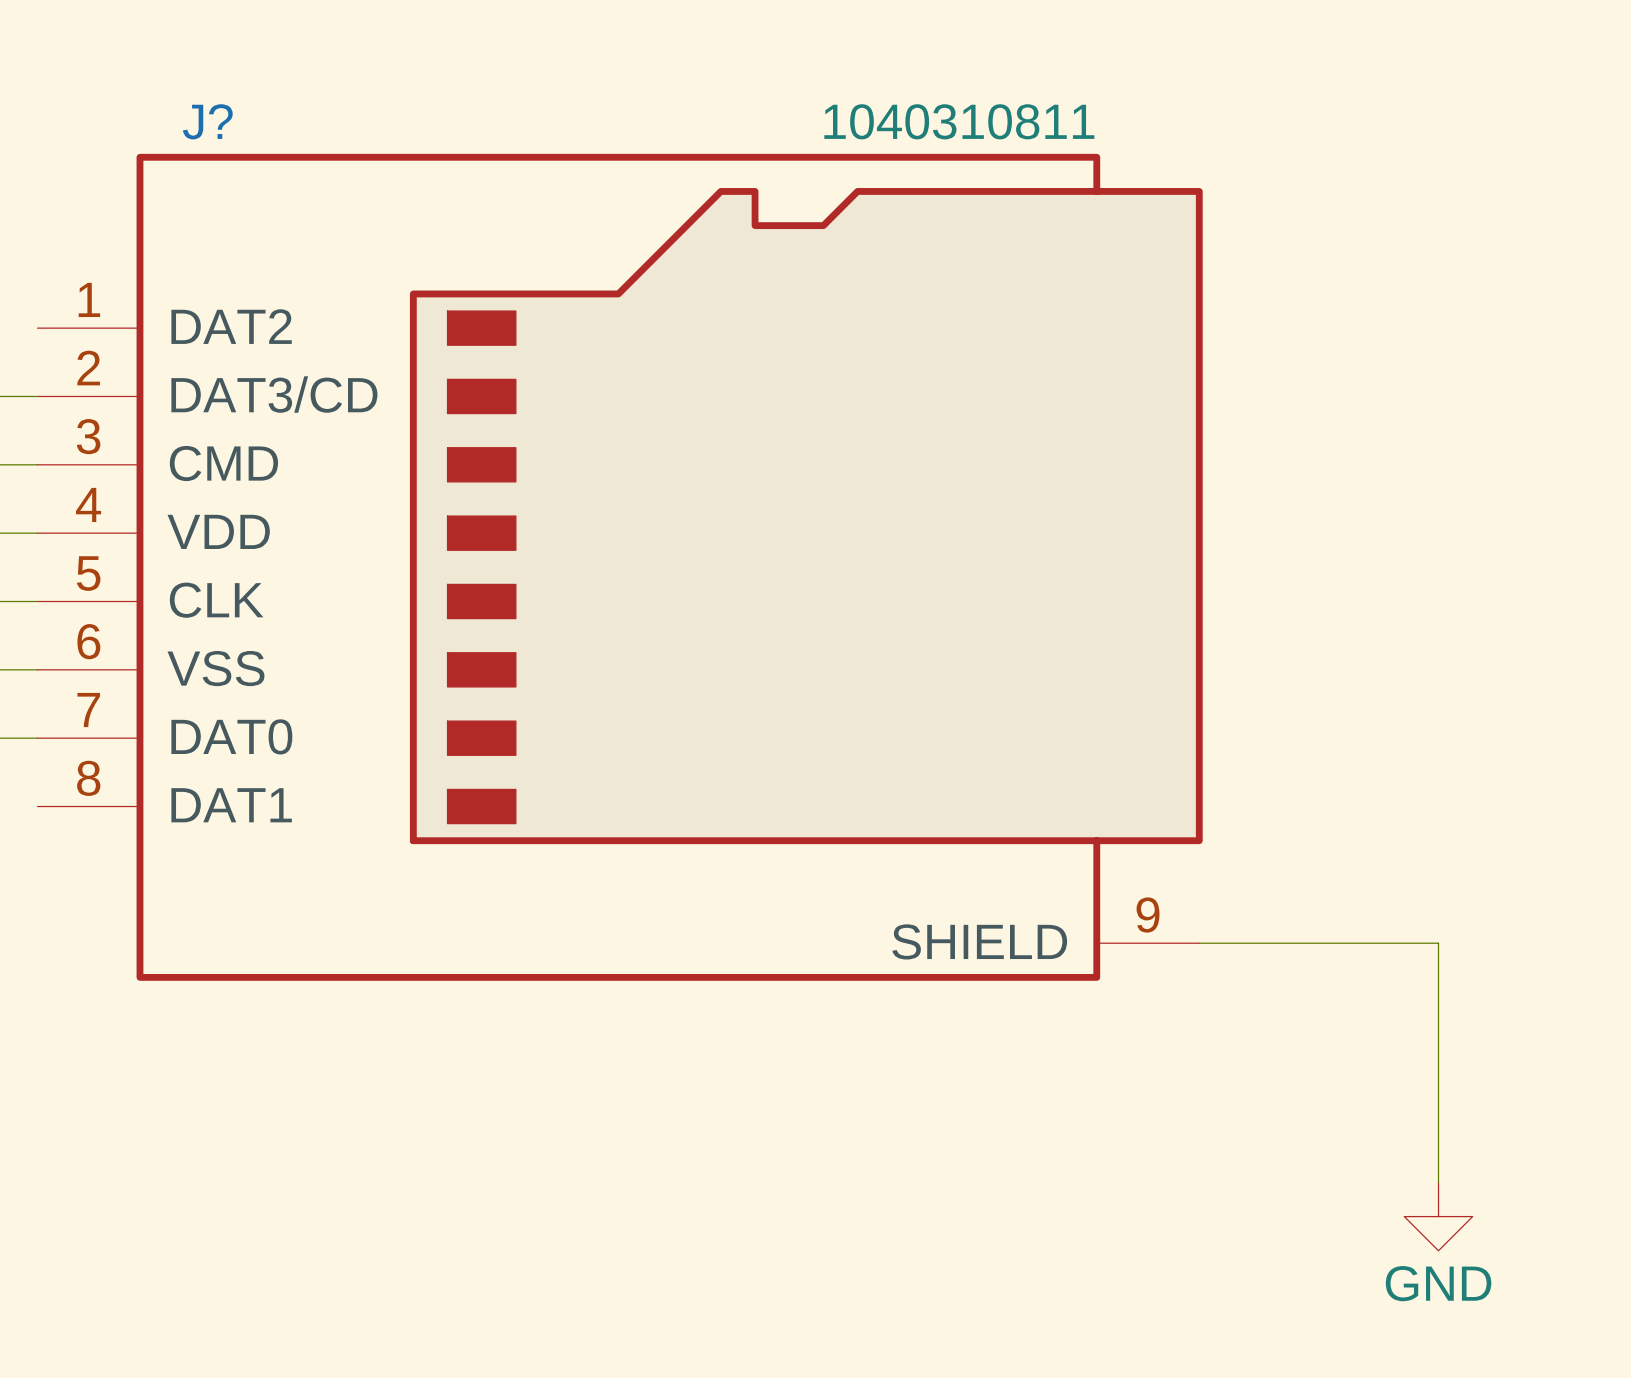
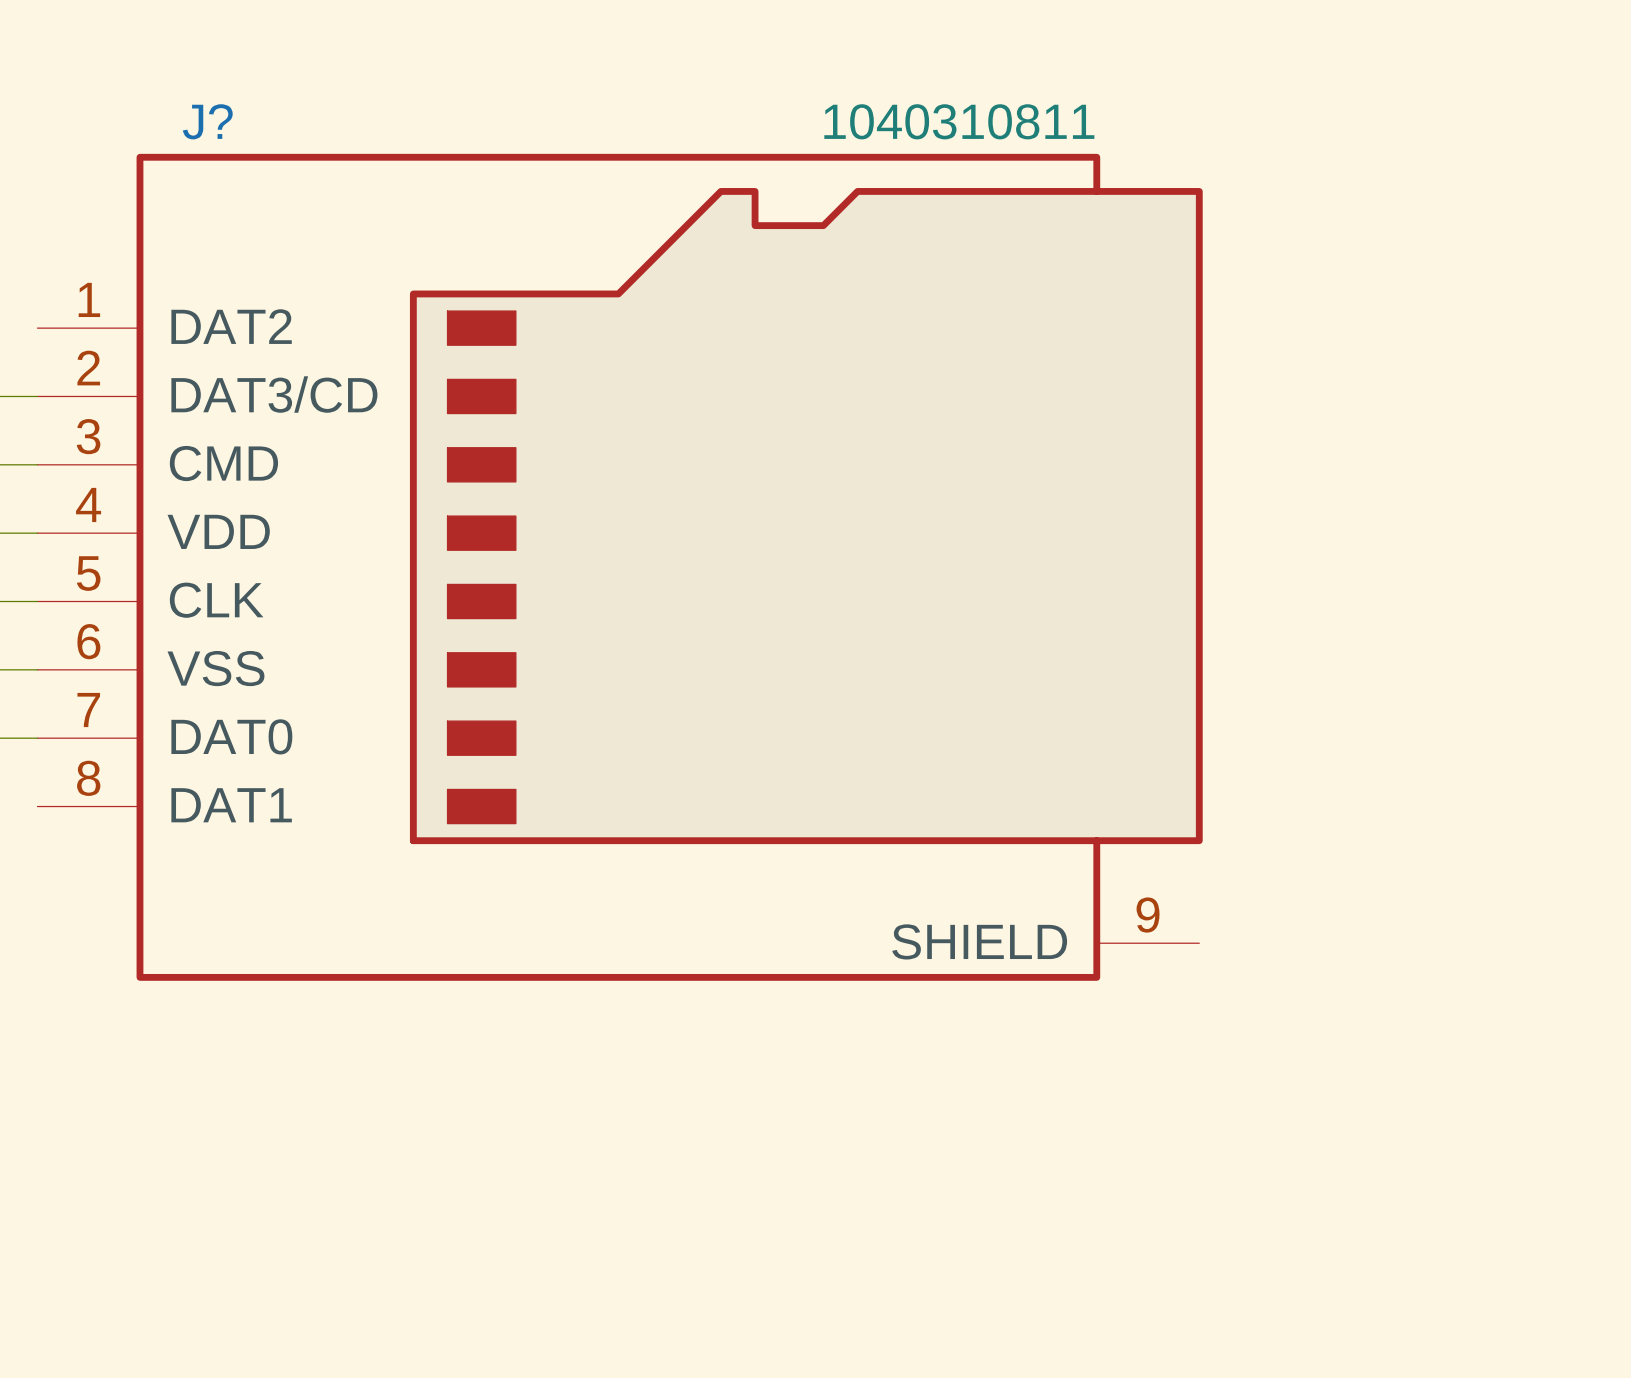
wire: (1199, 943) (1438, 943) (1438, 1182) -> none
power symbol: GND (1438, 1216) -> none

